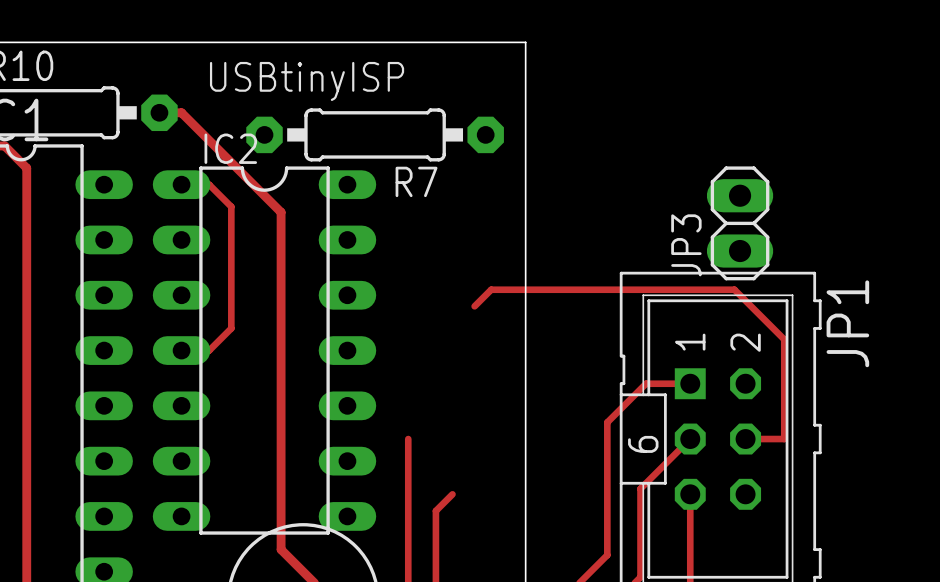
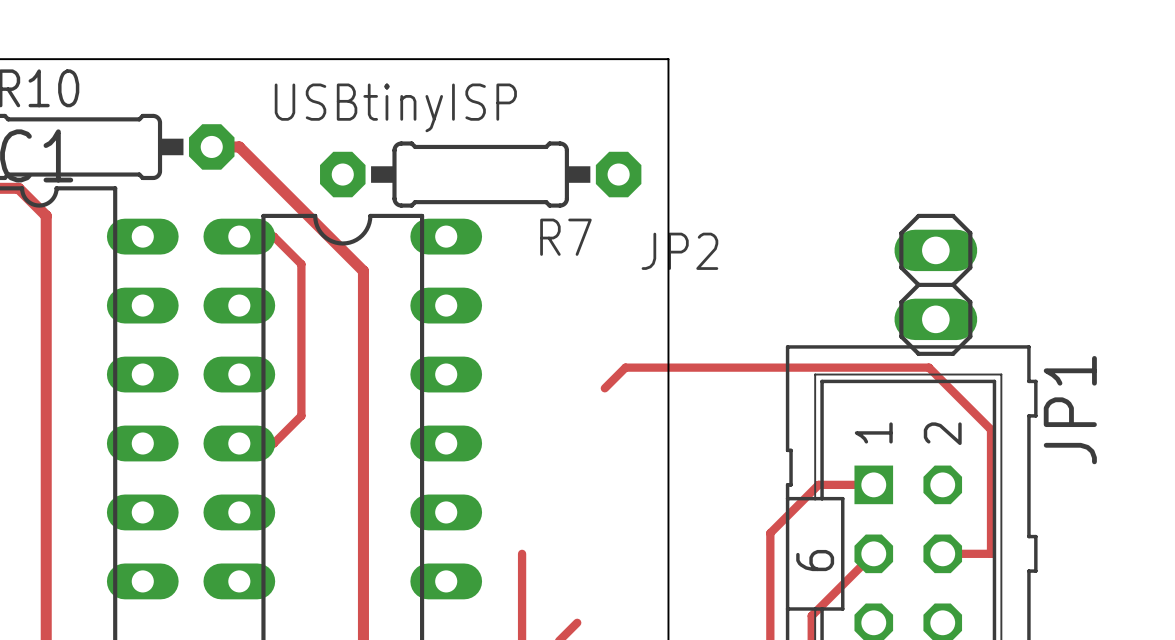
IC2 name: IC2 (230, 148) -> none
R7 name: R7 (416, 181) -> none
text: none -> R7 (565, 237)
text: none -> JP2 (679, 251)
JP3 name: JP3 (686, 245) -> none

